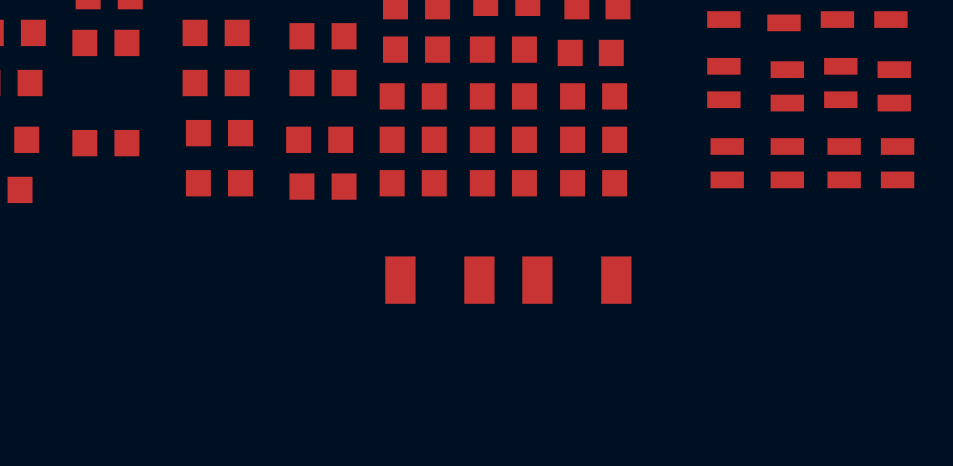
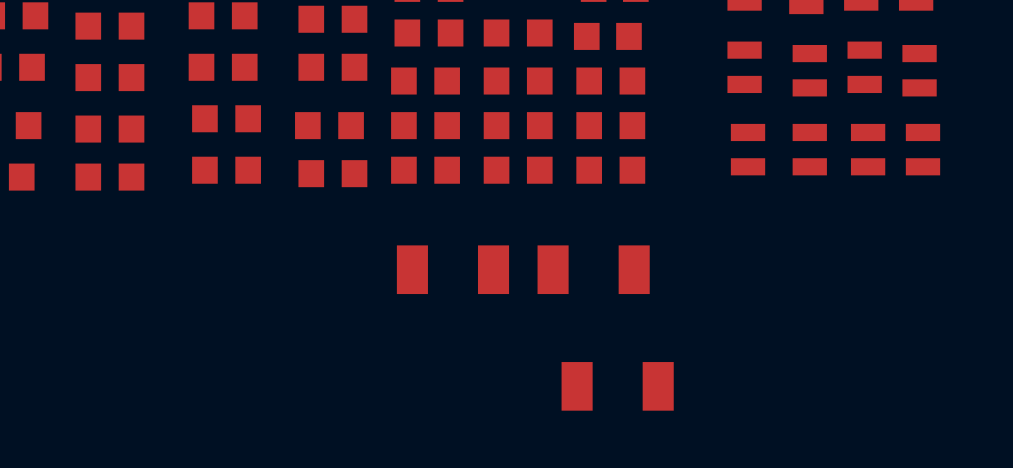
part: none -> (109, 77)
part: none -> (109, 177)
part: none -> (617, 386)

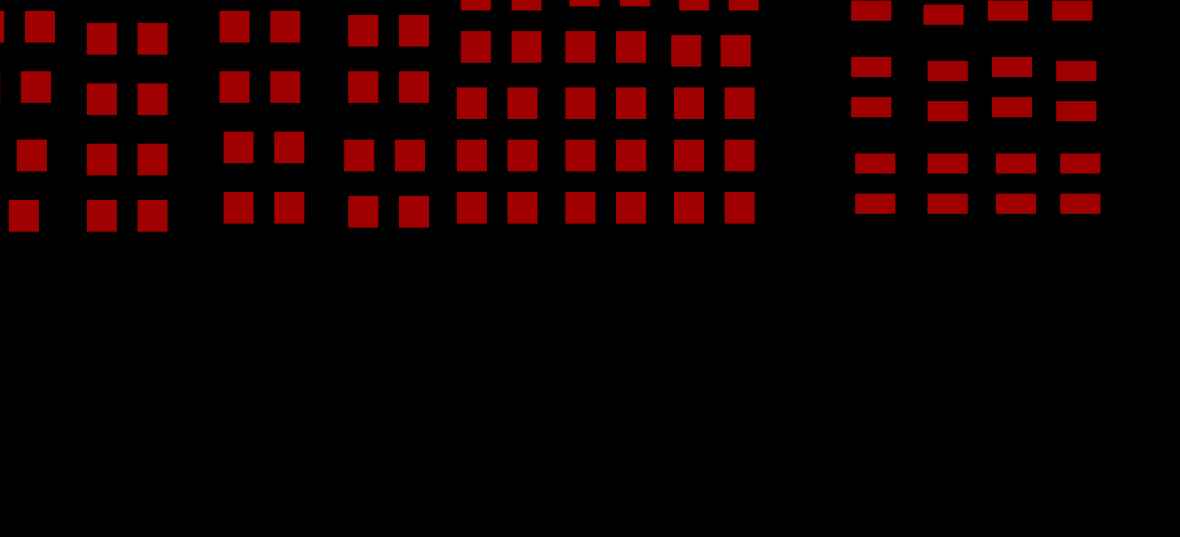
part: (452, 269) -> none
part: (593, 269) -> none
part: (617, 386) -> none

